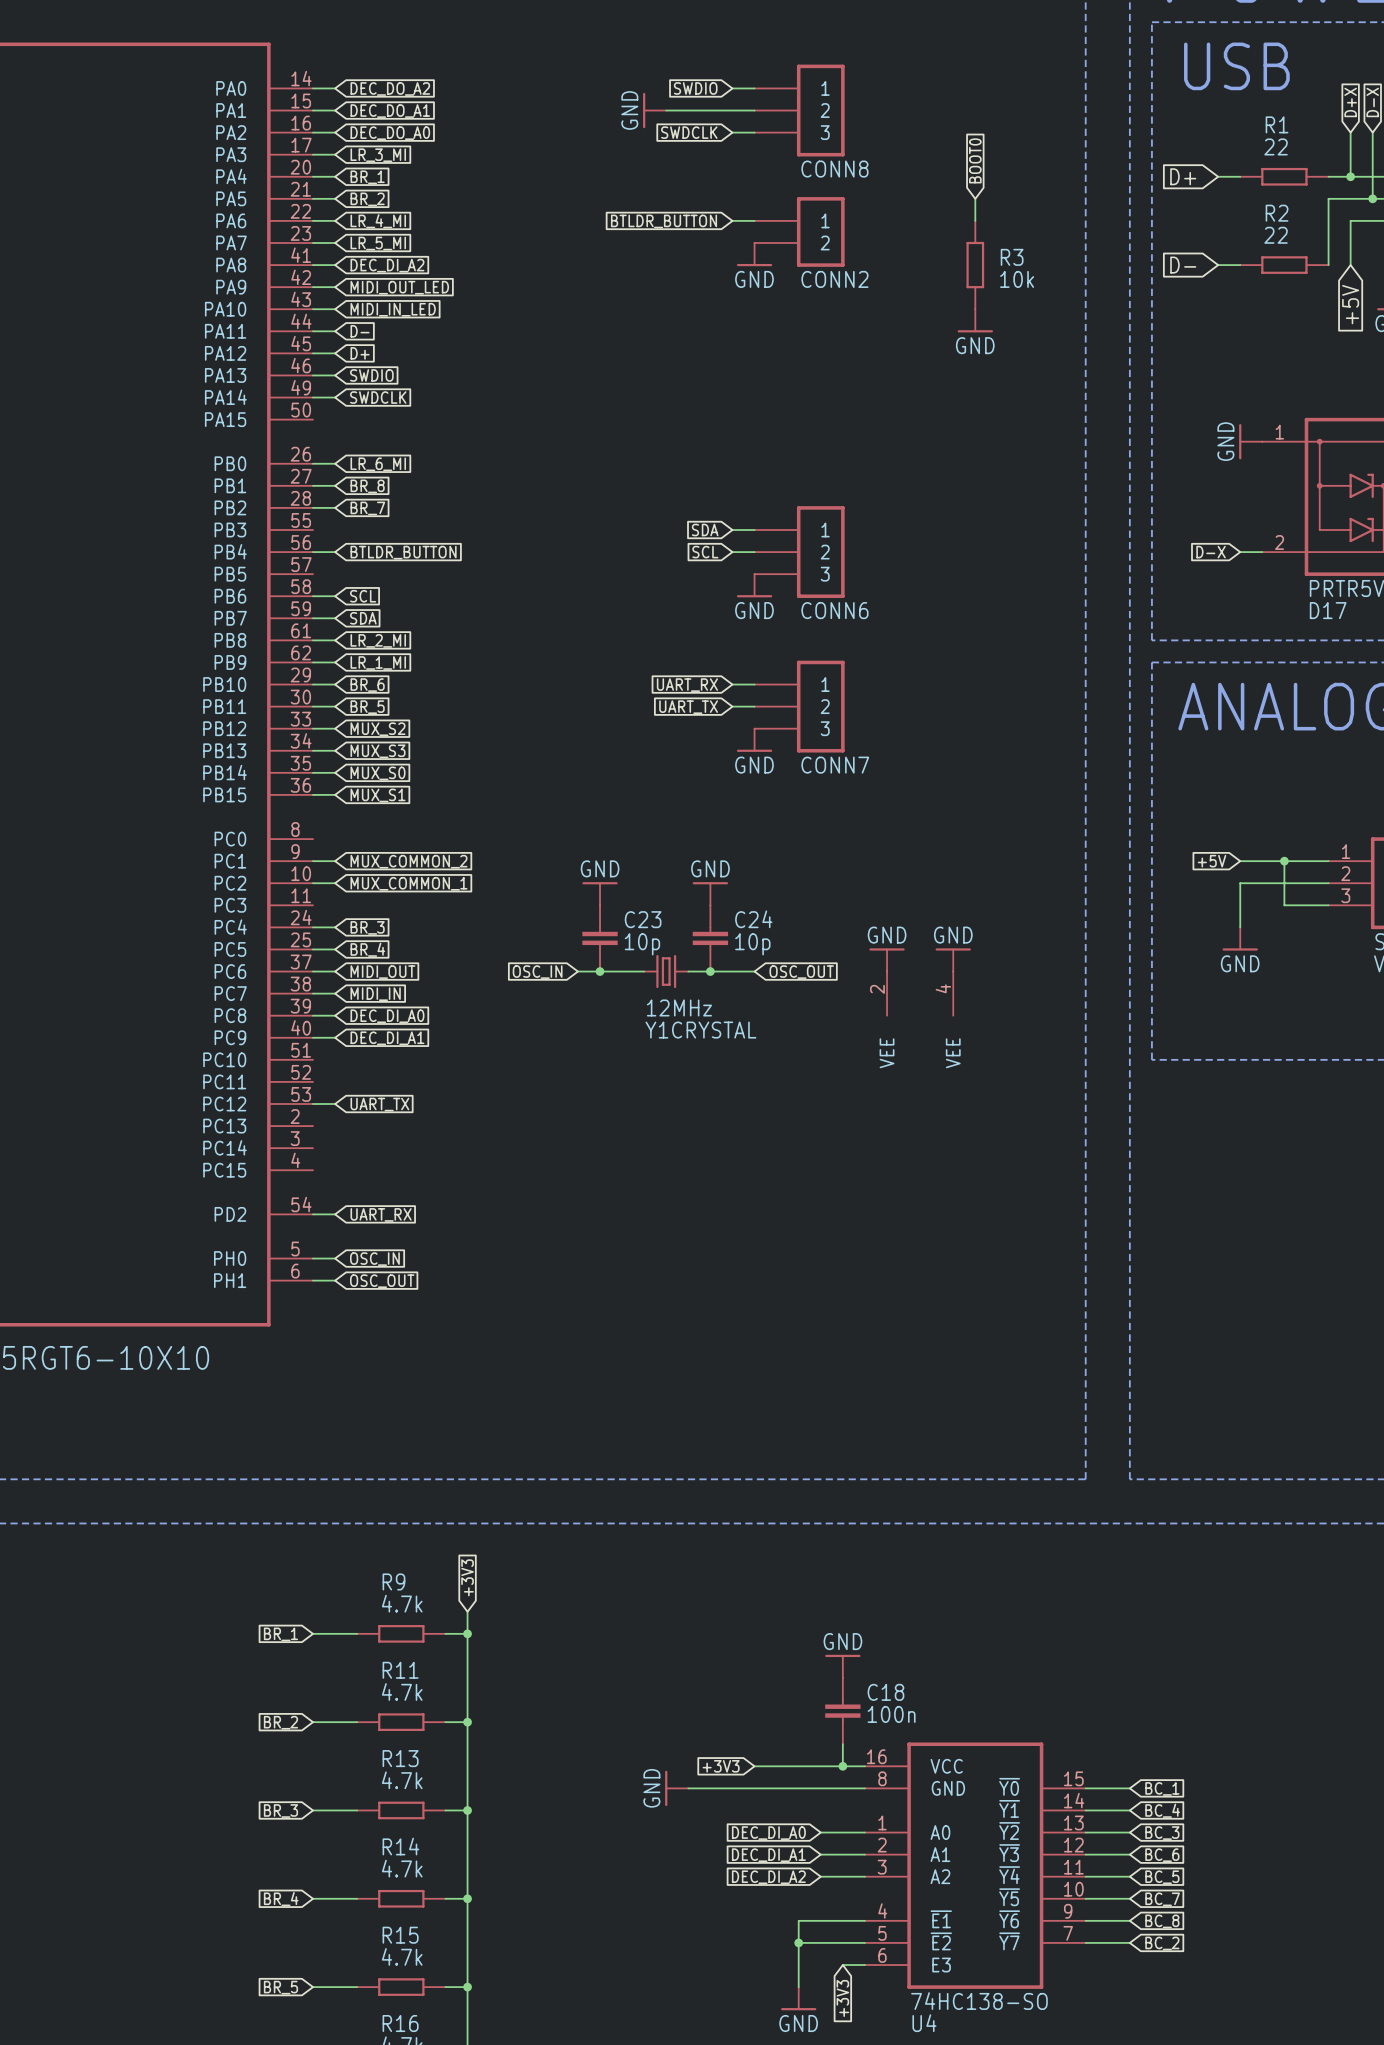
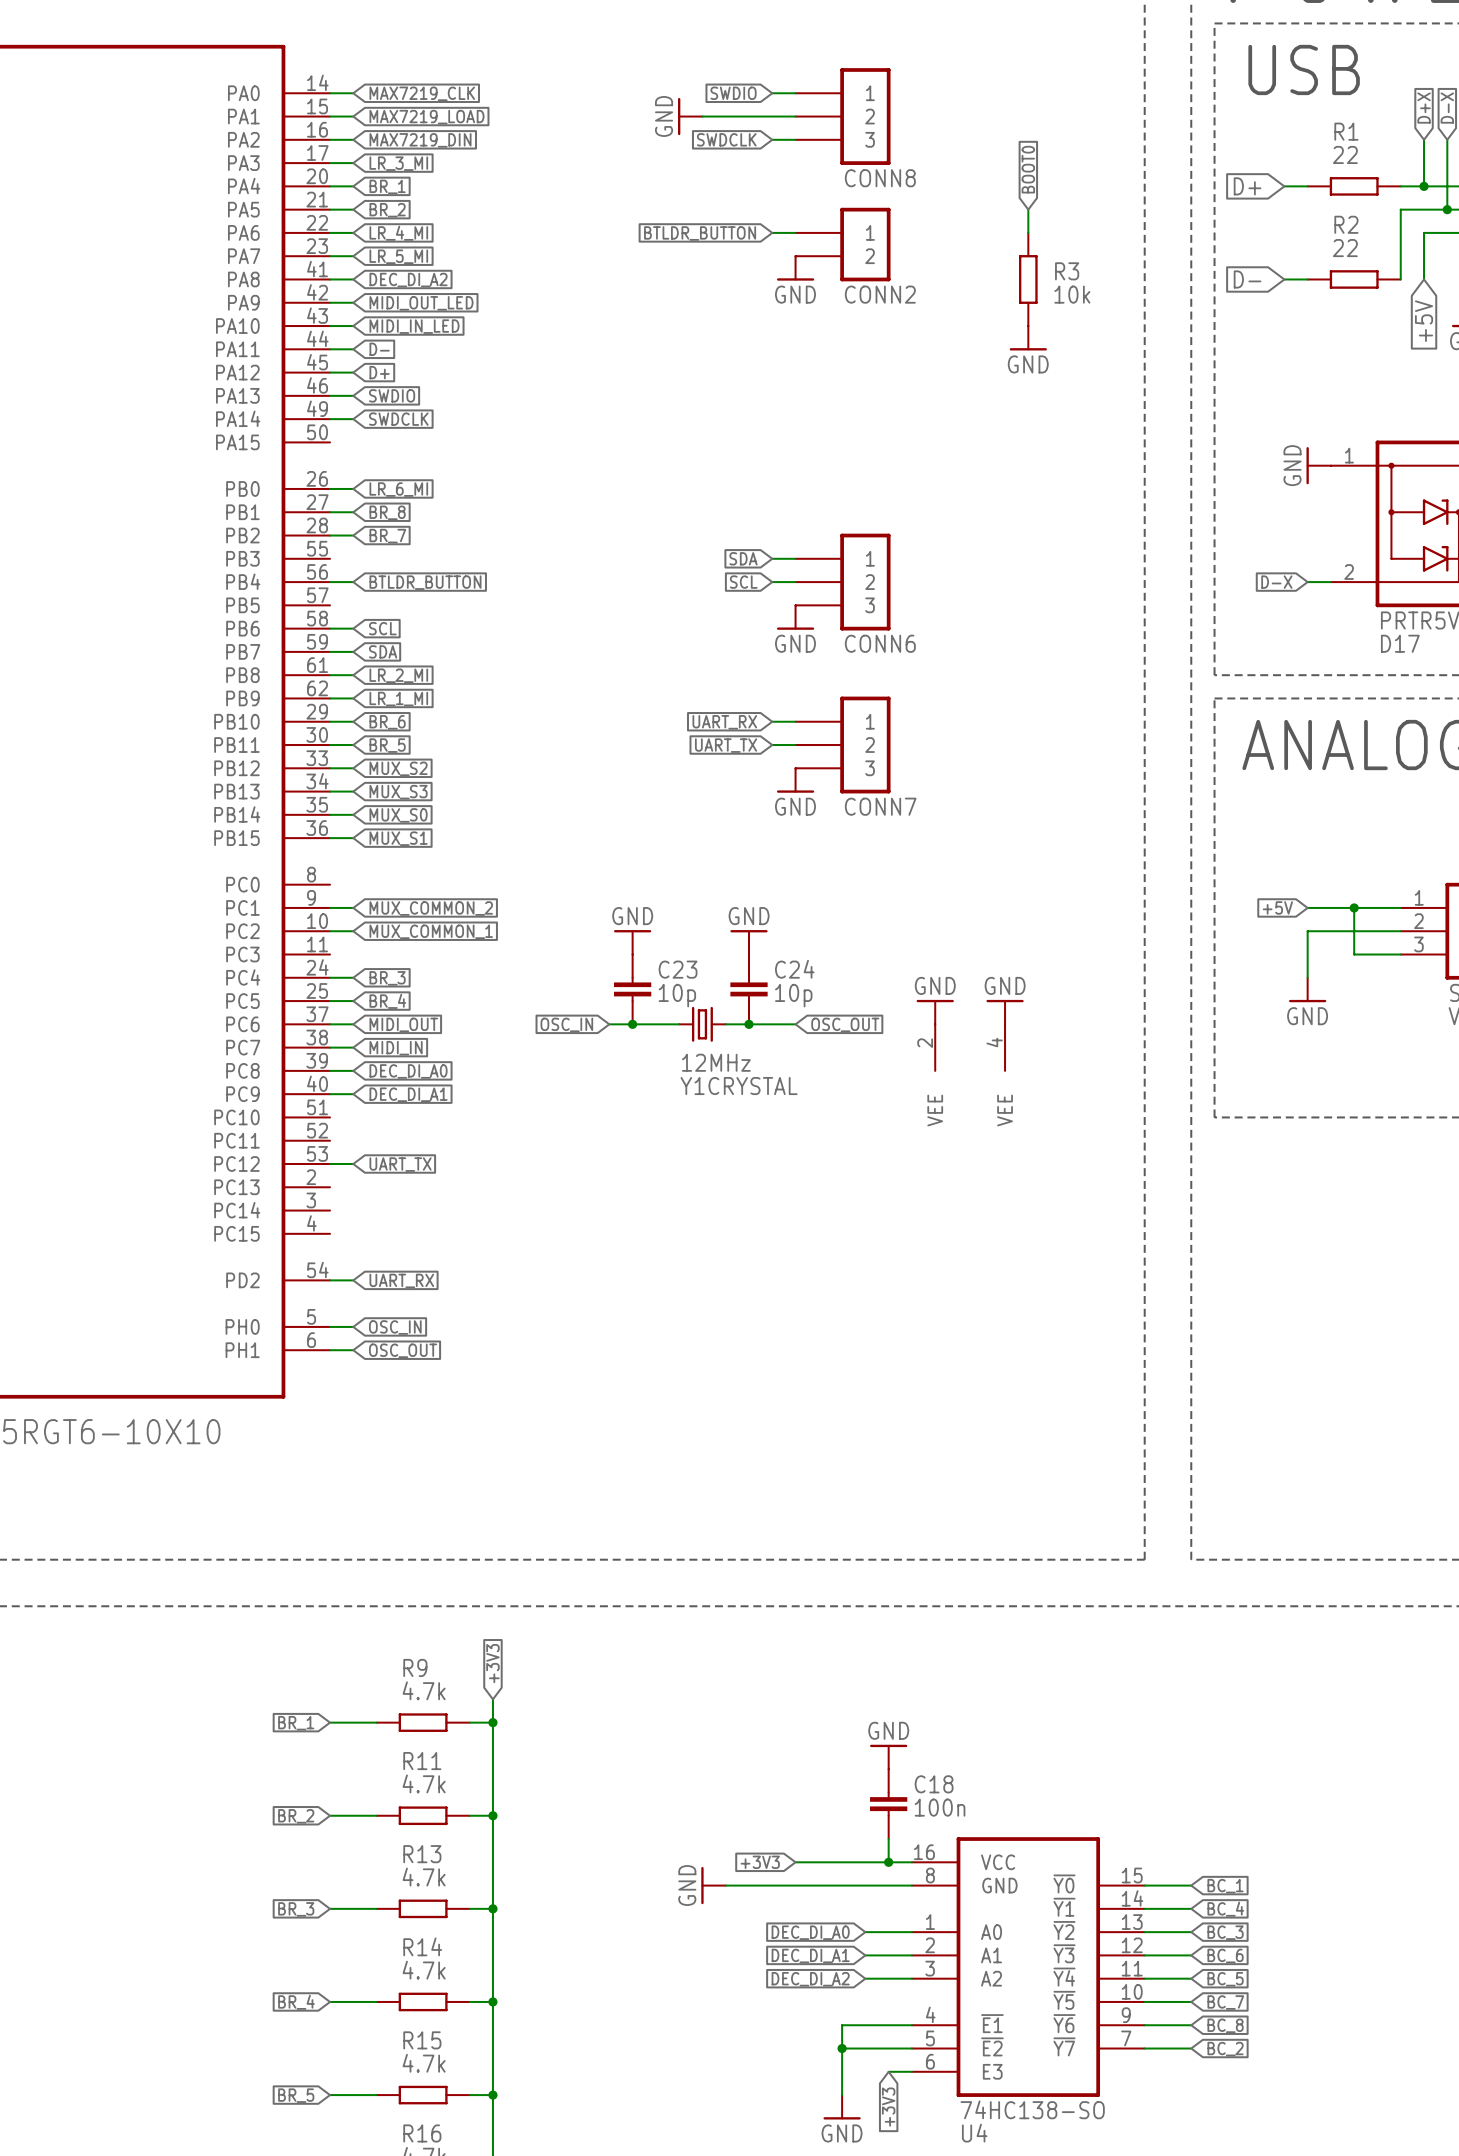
global label: DEC_DO_A2 (390, 88) -> MAX7219_CLK (422, 93)
global label: DEC_DO_A1 (390, 111) -> MAX7219_LOAD (426, 117)
global label: DEC_DO_A0 (390, 133) -> MAX7219_DIN (420, 140)

